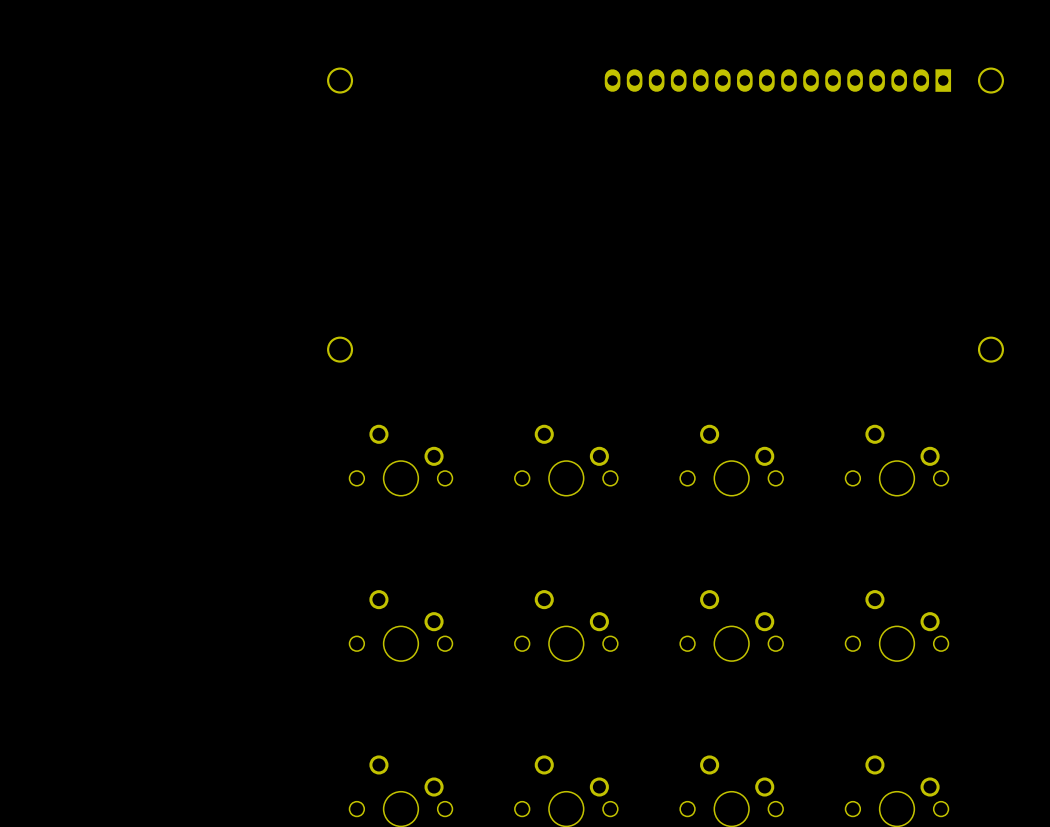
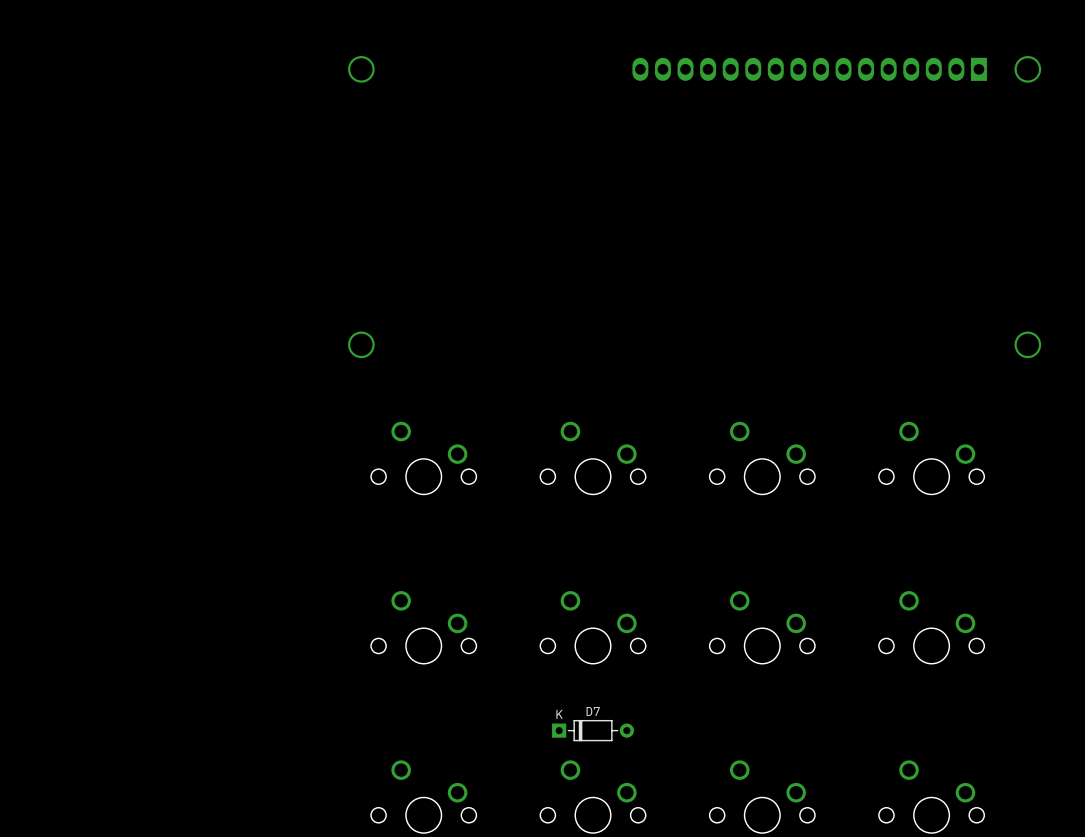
D7: none -> (593, 730)

